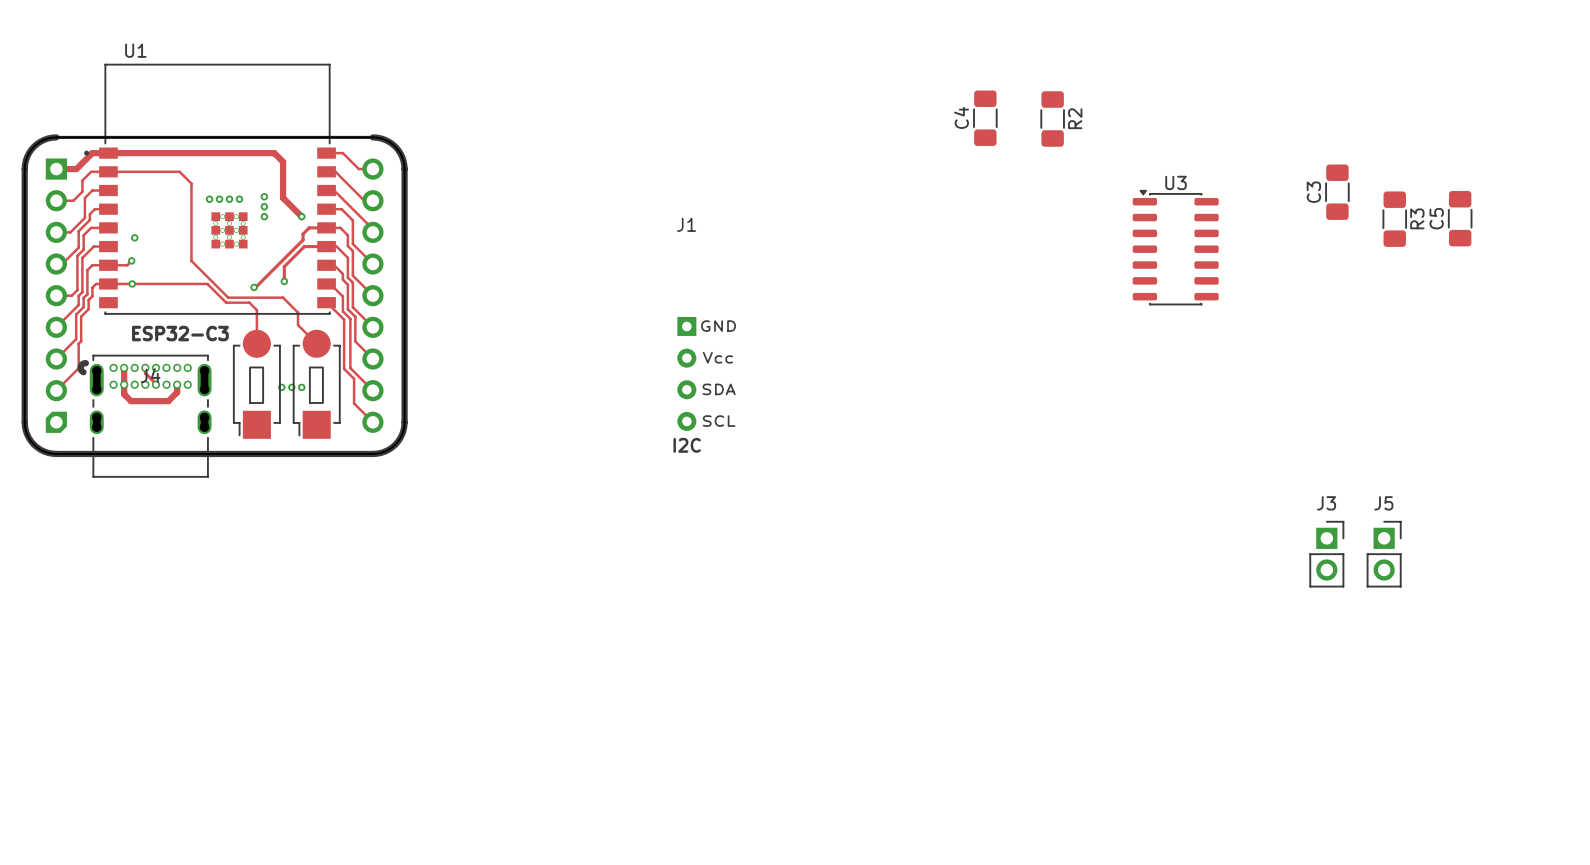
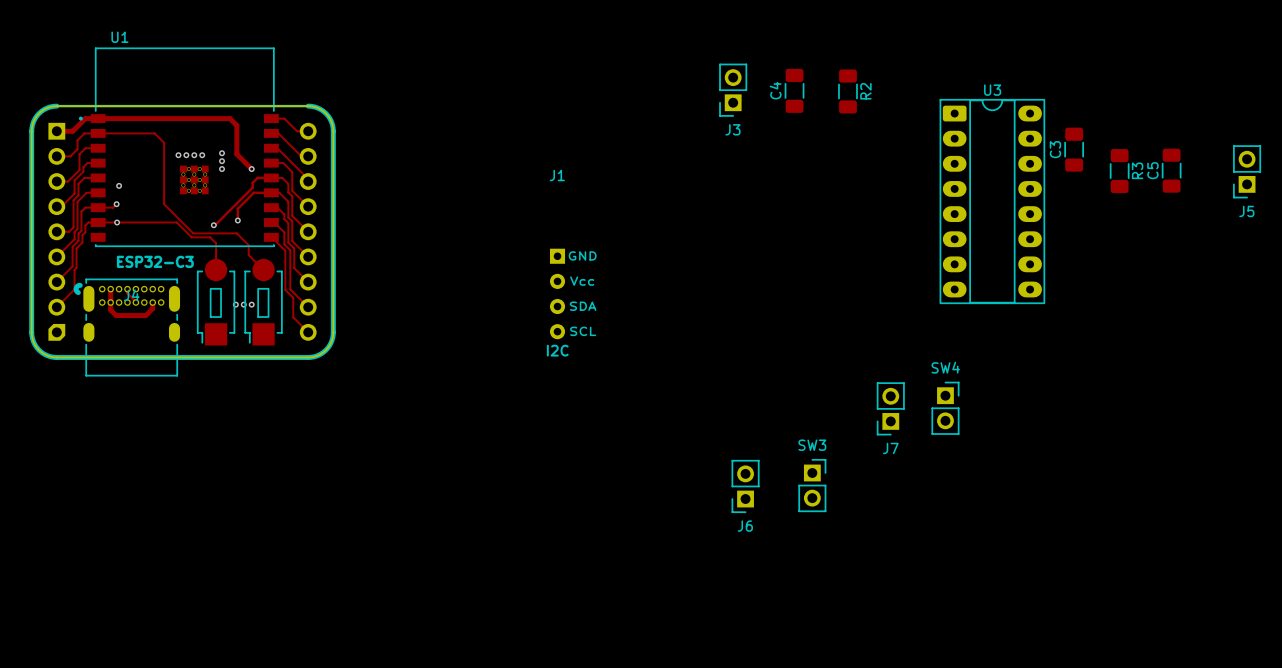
U3 name position: U3 (1176, 182) -> U3 (992, 90)
U3 footprint: [1132, 189, 1219, 306] -> [939, 99, 1045, 304]
SW4: none -> (945, 408)
J7: none -> (890, 408)
J3 rotation: 0° (1326, 554) -> 180° (733, 90)
J3 position: (1326, 554) -> (733, 90)
J5 rotation: 0° (1384, 554) -> 180° (1247, 171)
J5 position: (1384, 554) -> (1247, 171)
SW3: none -> (812, 485)
J6: none -> (745, 486)

